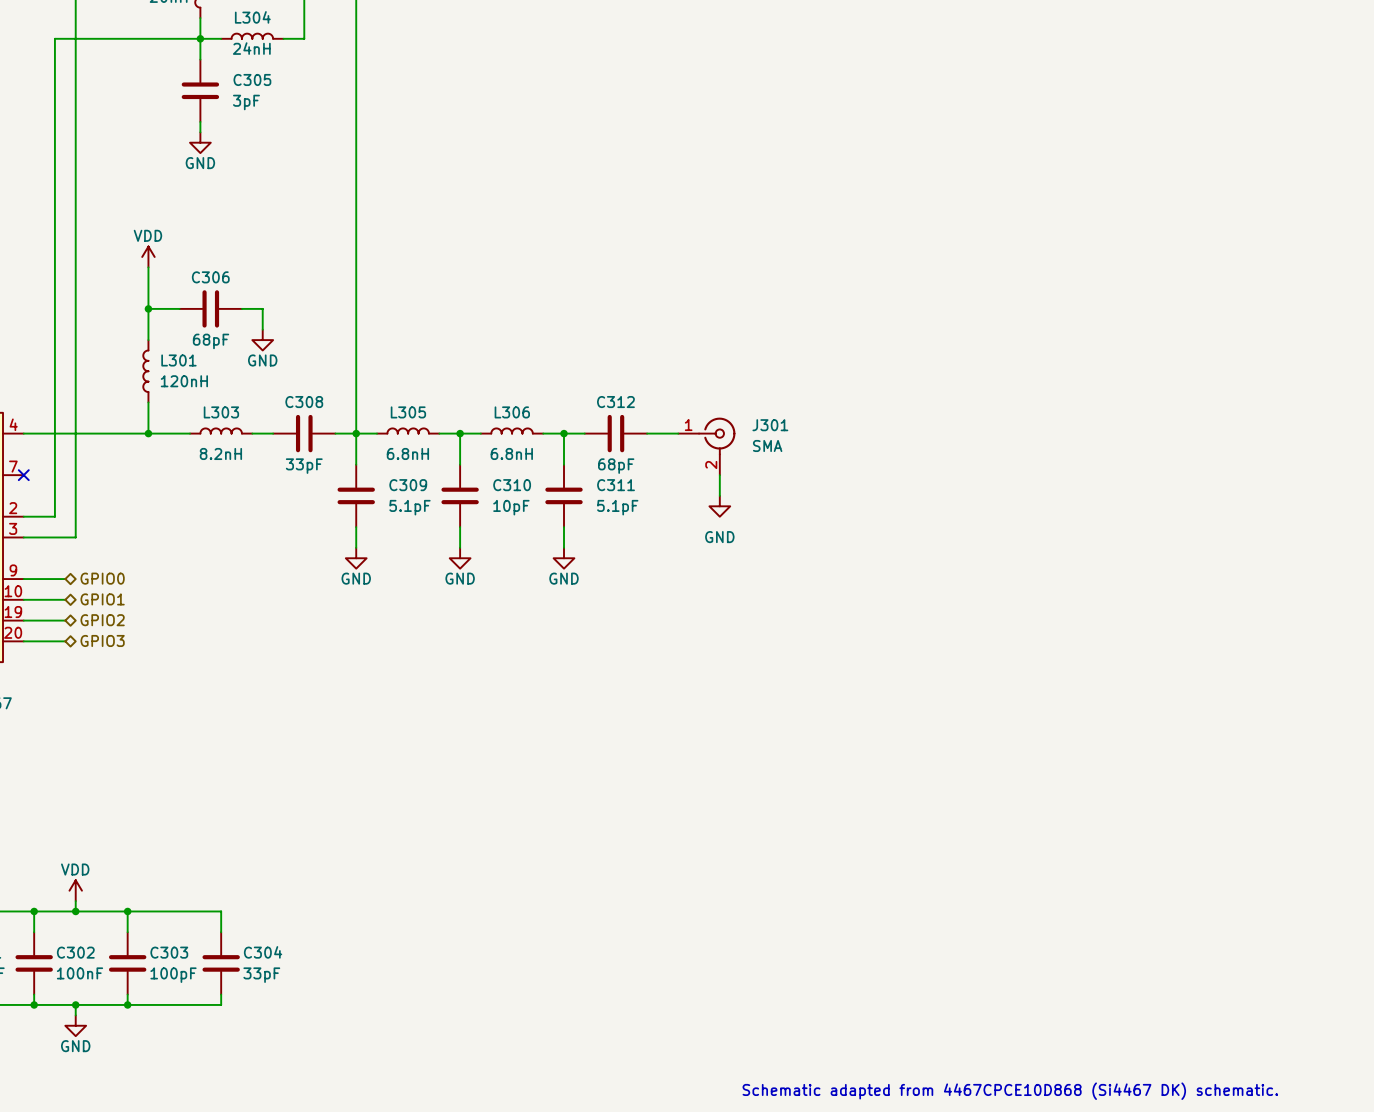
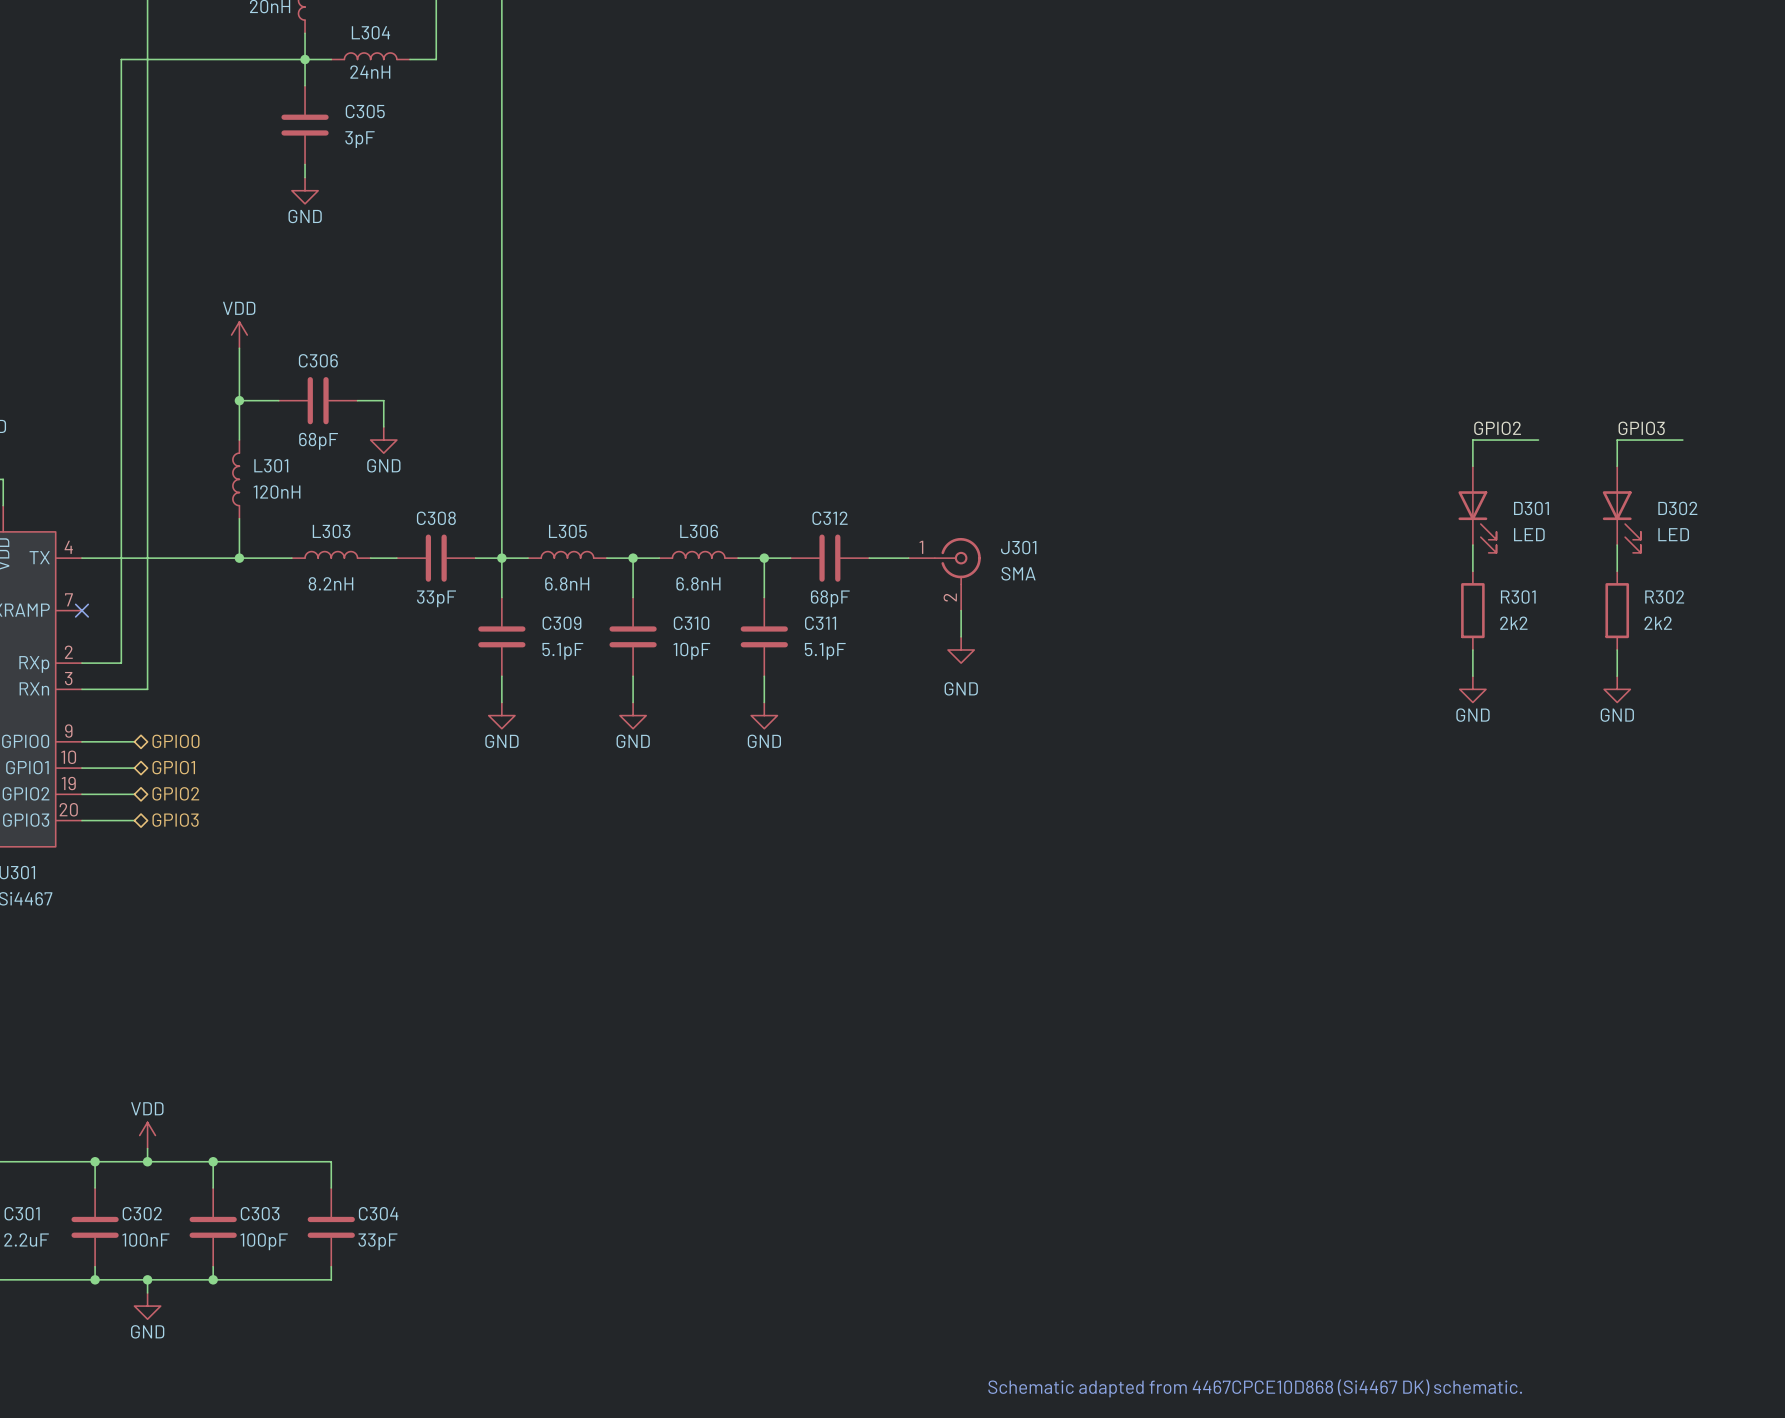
label: none -> GPIO2 (1497, 428)
label: none -> GPIO3 (1641, 428)
wire: none -> (1538, 440) (1472, 440) (1472, 466)
wire: none -> (1682, 440) (1617, 440) (1617, 466)
D301: none -> LED (1477, 509)
D302: none -> LED (1621, 509)
wire: none -> (1472, 545) (1472, 571)
wire: none -> (1617, 545) (1617, 571)
R301: none -> 2k2 (1472, 610)
R302: none -> 2k2 (1617, 610)
wire: none -> (1472, 649) (1472, 676)
wire: none -> (1617, 649) (1617, 676)
power symbol: none -> GND (1472, 689)
power symbol: none -> GND (1617, 689)

